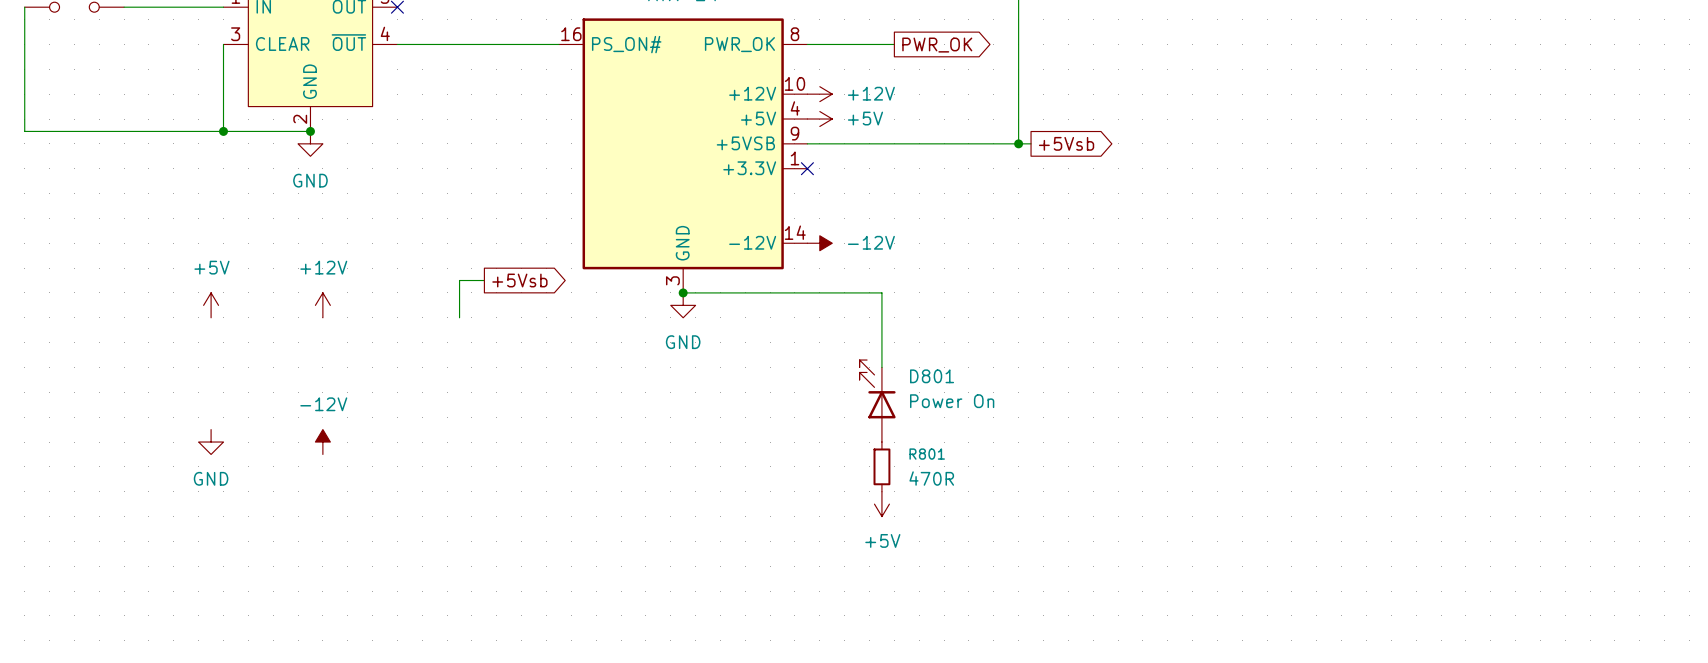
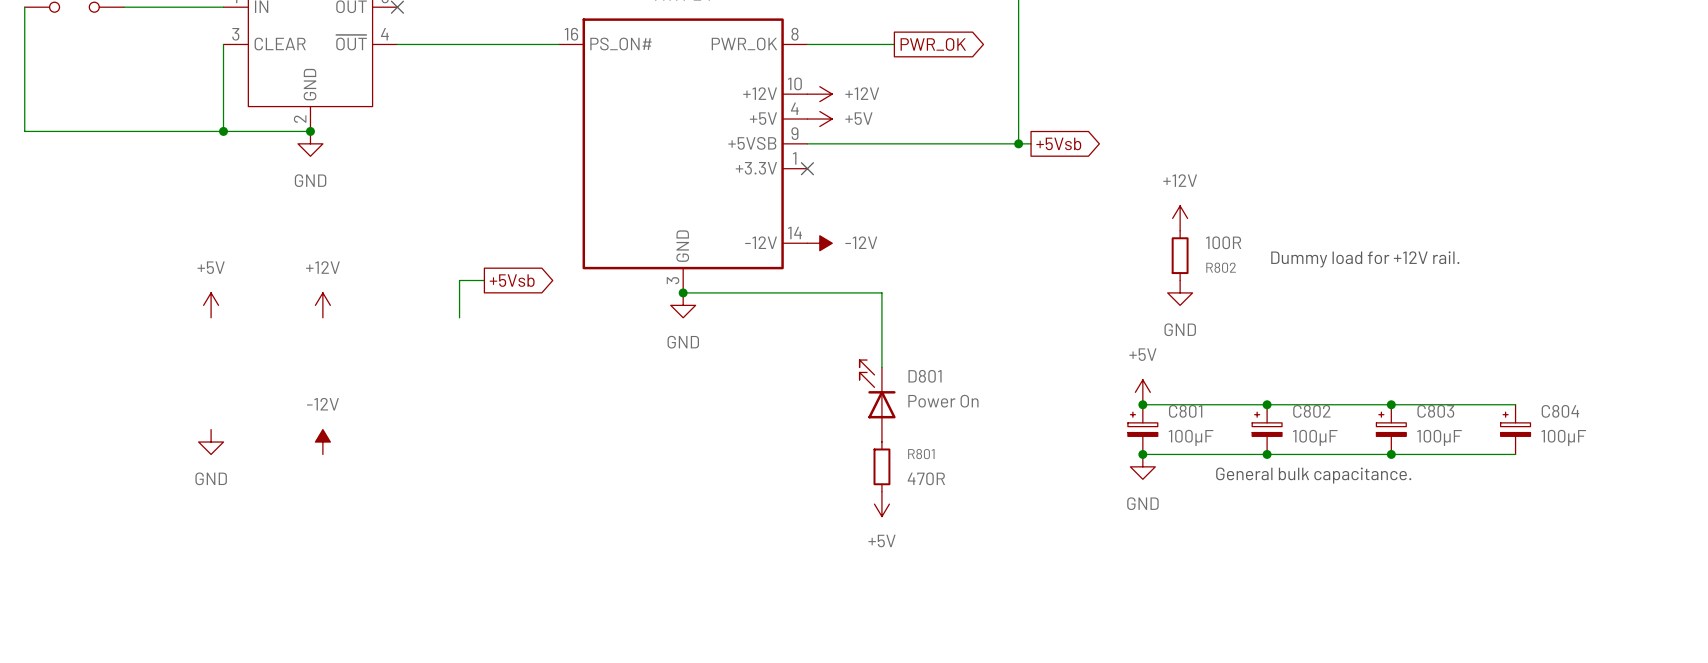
power symbol: none -> +12V (1180, 218)
R802: none -> 100R (1180, 255)
text: none -> Dummy load for +12V rail. (1365, 259)
power symbol: none -> GND (1180, 292)
power symbol: none -> +5V (1142, 392)
wire: none -> (1142, 404) (1515, 404)
junction: none -> (1142, 404)
junction: none -> (1267, 404)
junction: none -> (1391, 404)
C801: none -> 100µF (1142, 429)
C802: none -> 100µF (1267, 429)
C803: none -> 100µF (1391, 429)
C804: none -> 100µF (1515, 429)
wire: none -> (1142, 454) (1515, 454)
junction: none -> (1142, 454)
junction: none -> (1267, 454)
junction: none -> (1391, 454)
power symbol: none -> GND (1142, 466)
text: none -> General bulk capacitance. (1313, 475)

